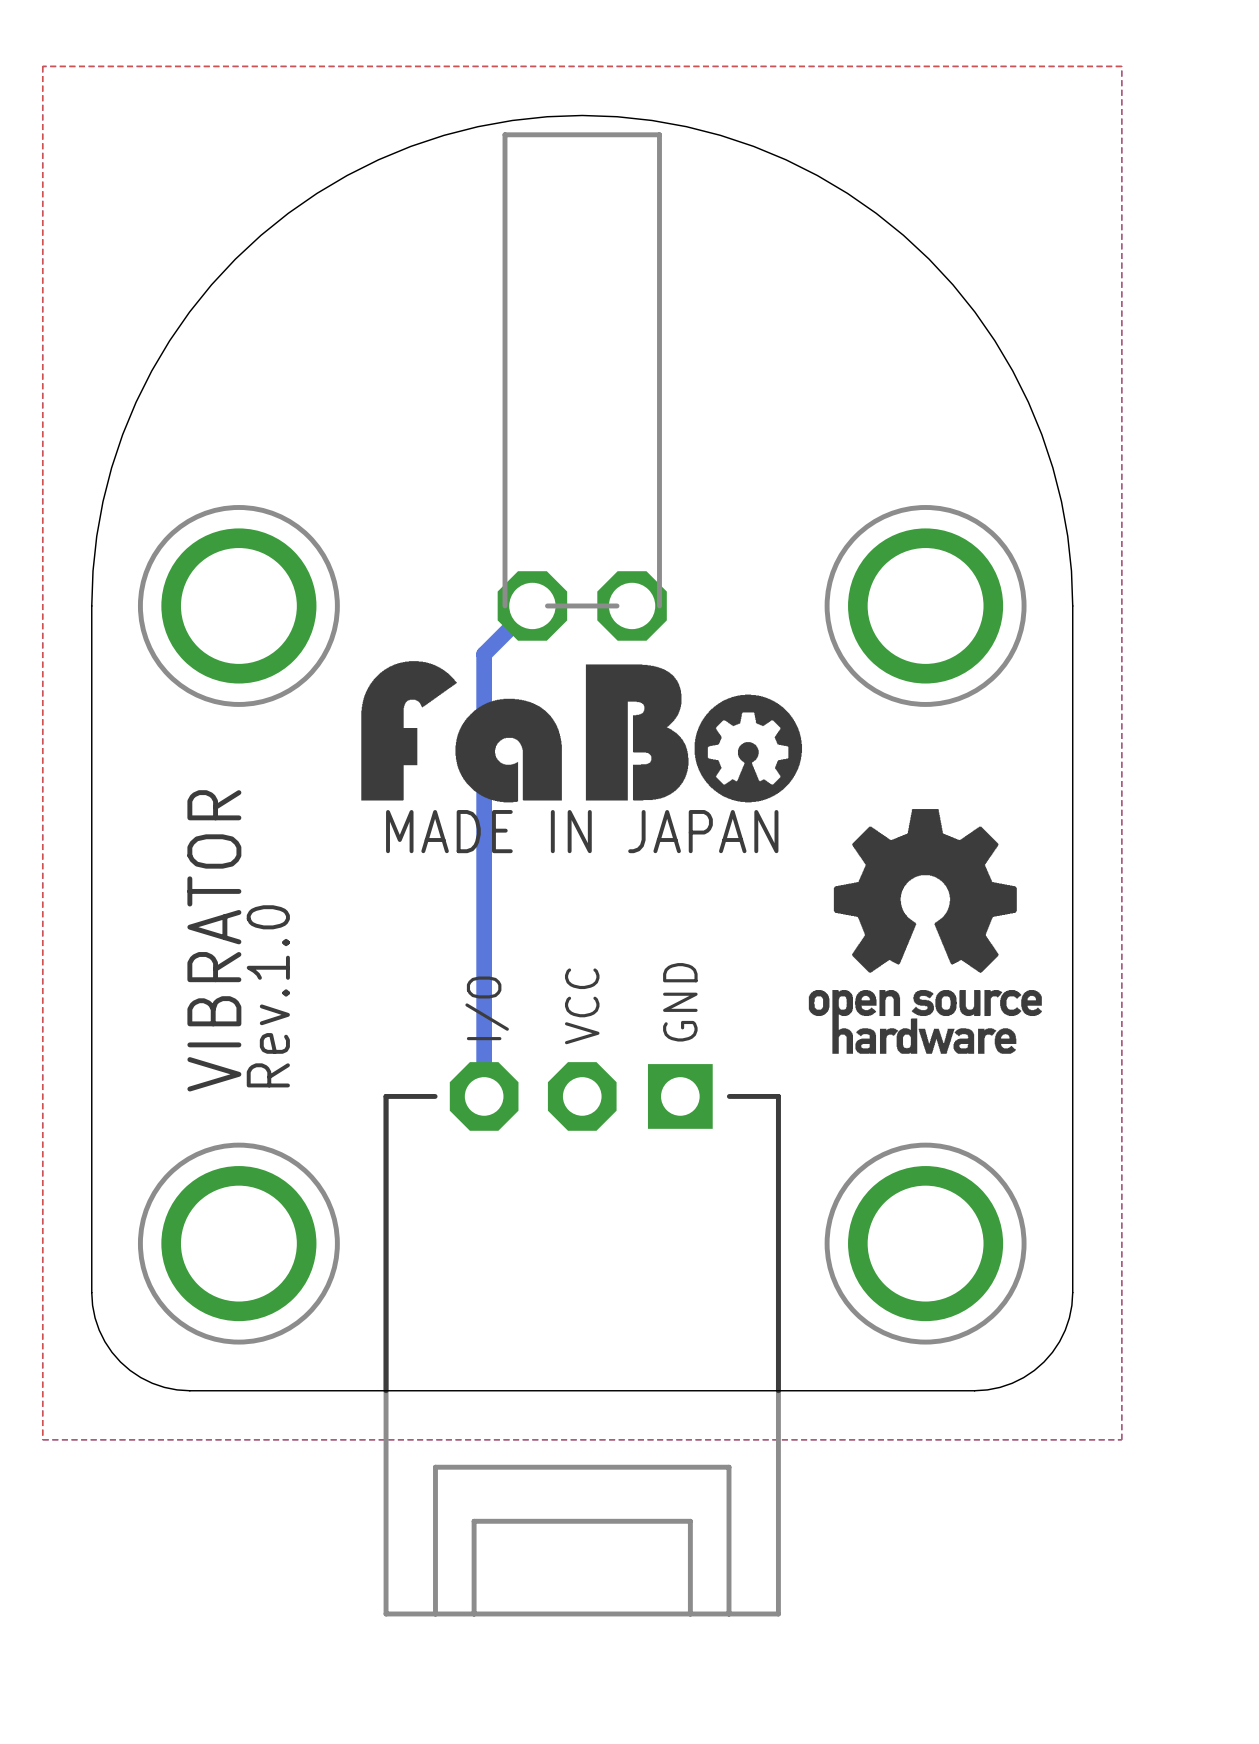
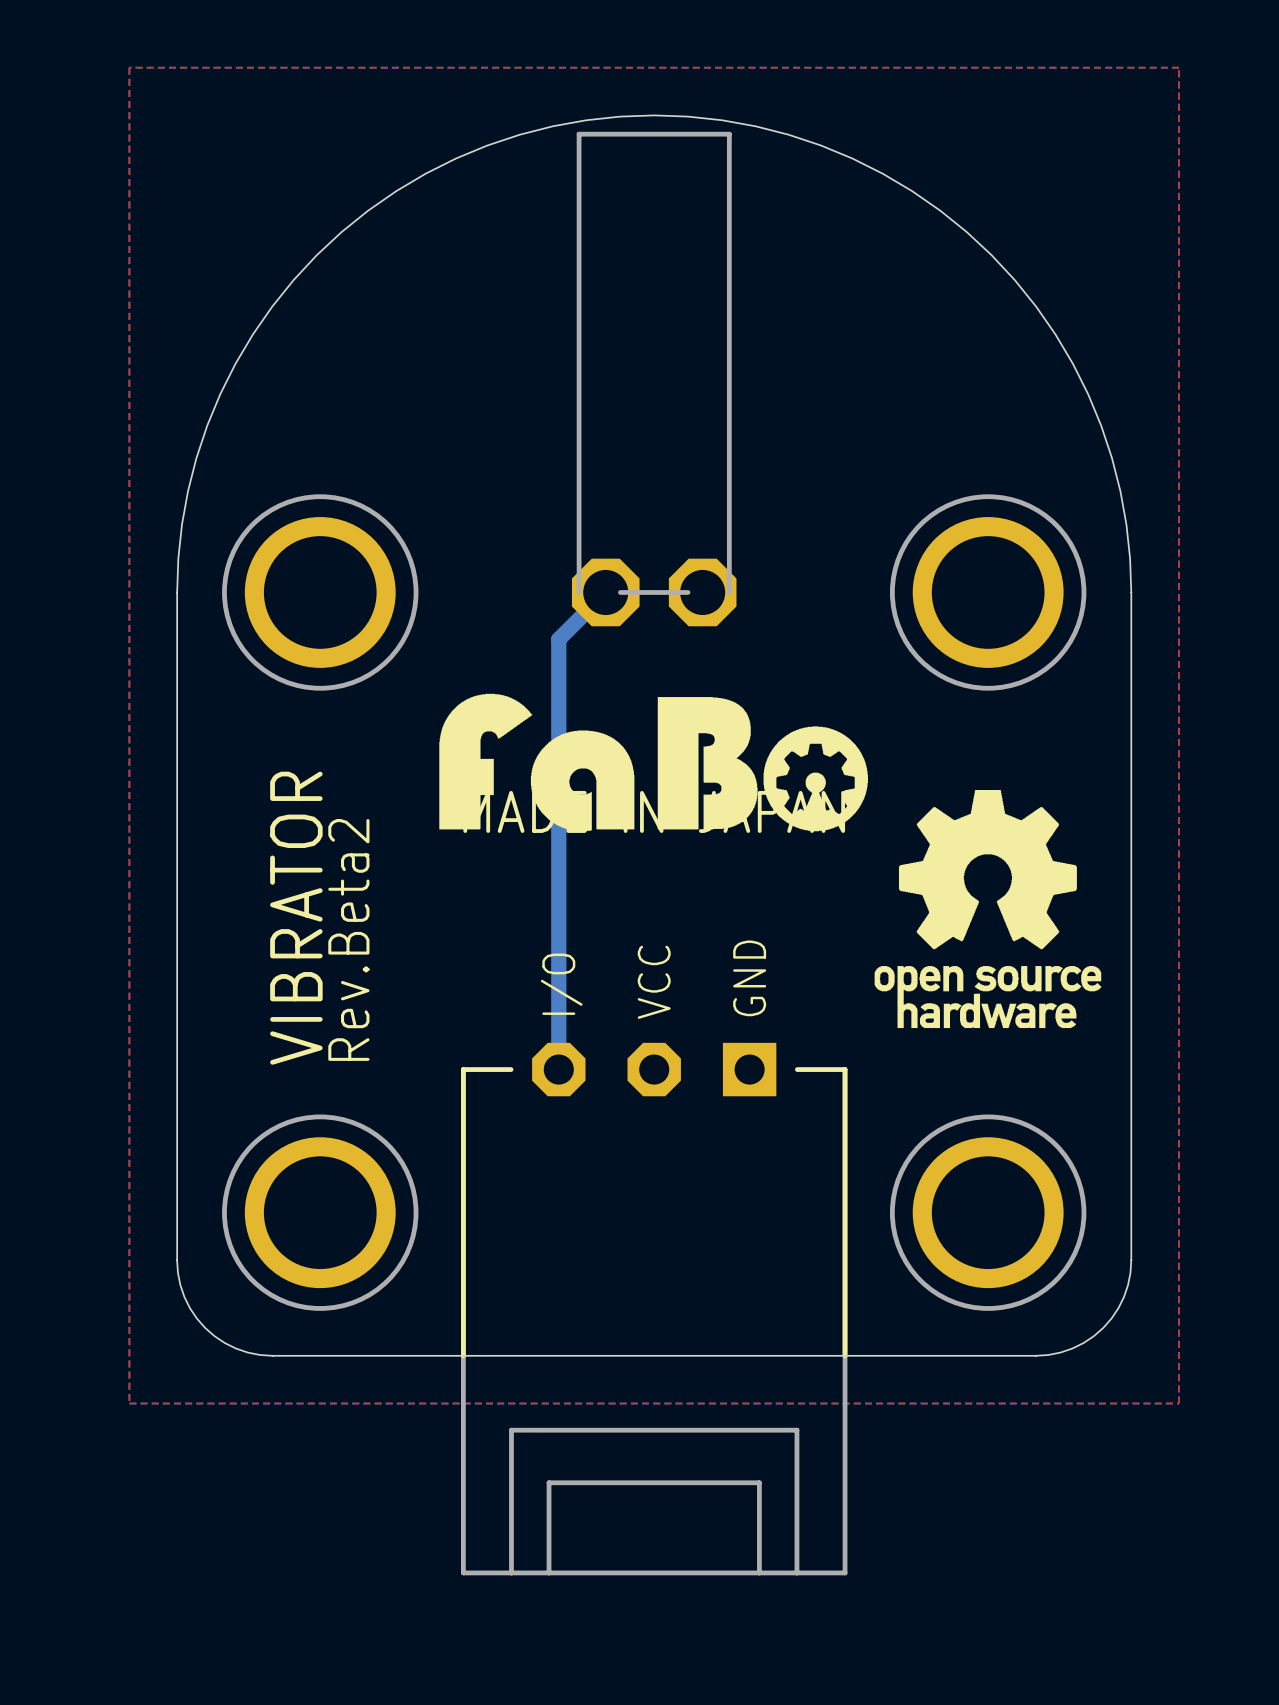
part footprint: [91, 115, 1073, 1617] -> [177, 115, 1132, 1576]
drawing position: (581, 731) -> (653, 762)
text: Rev.1.0 (268, 996) -> Rev.Beta2 (348, 939)

